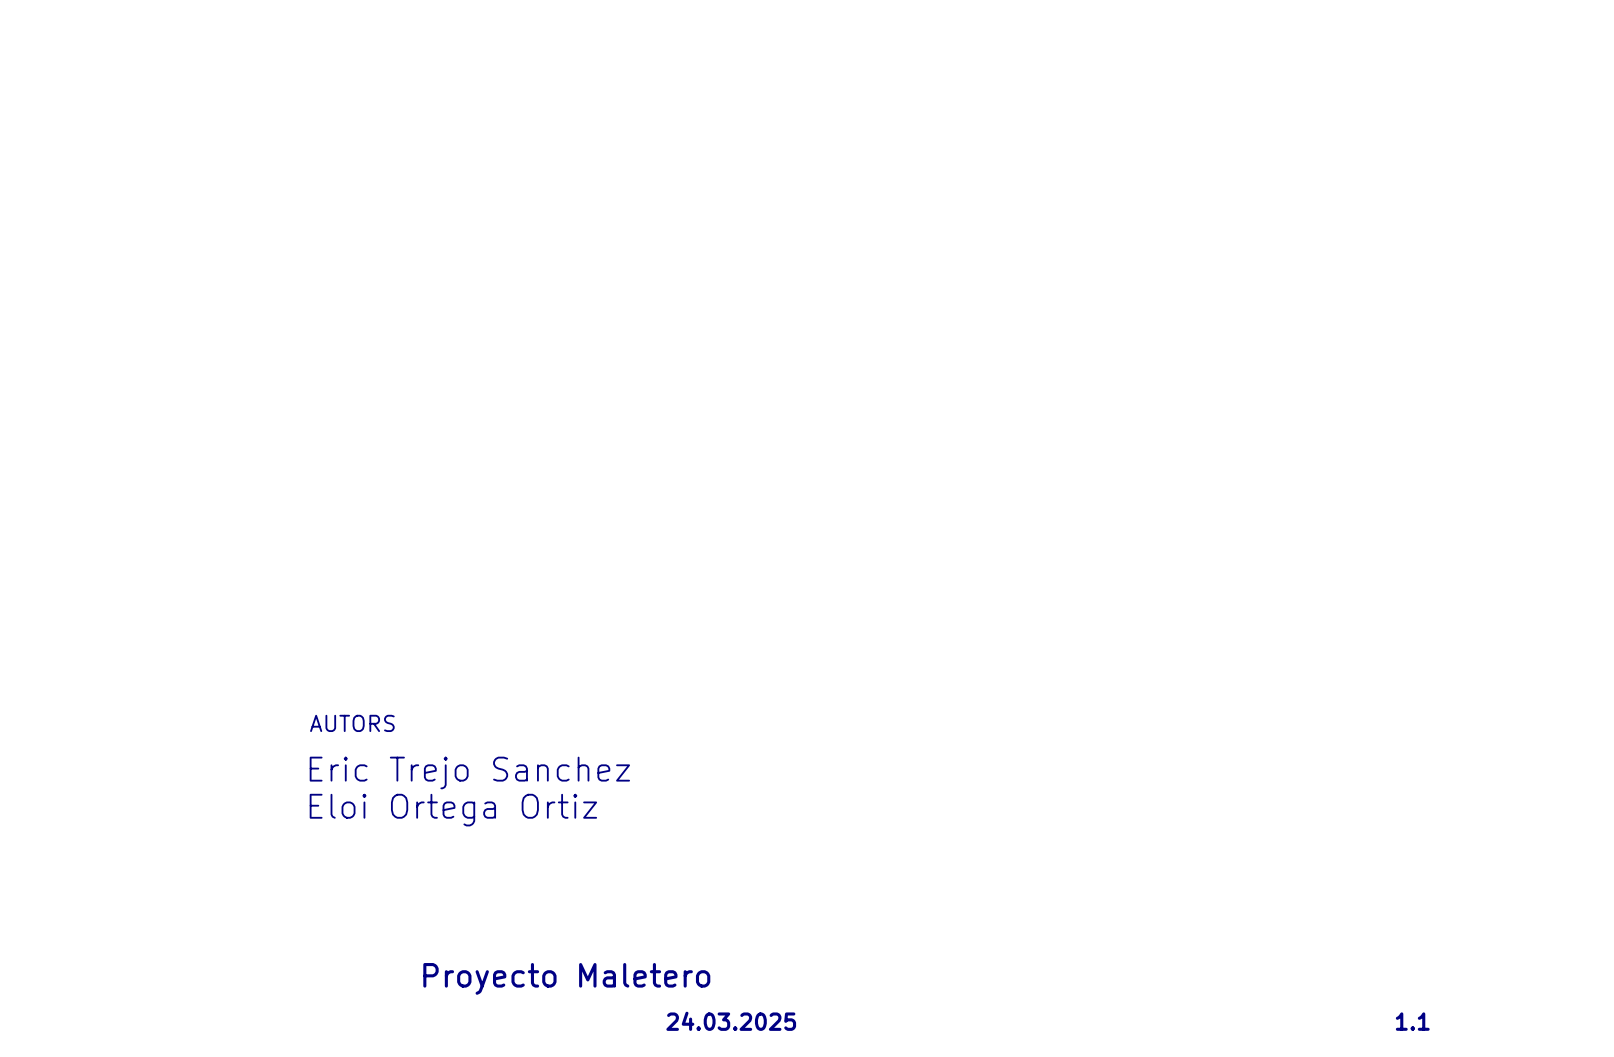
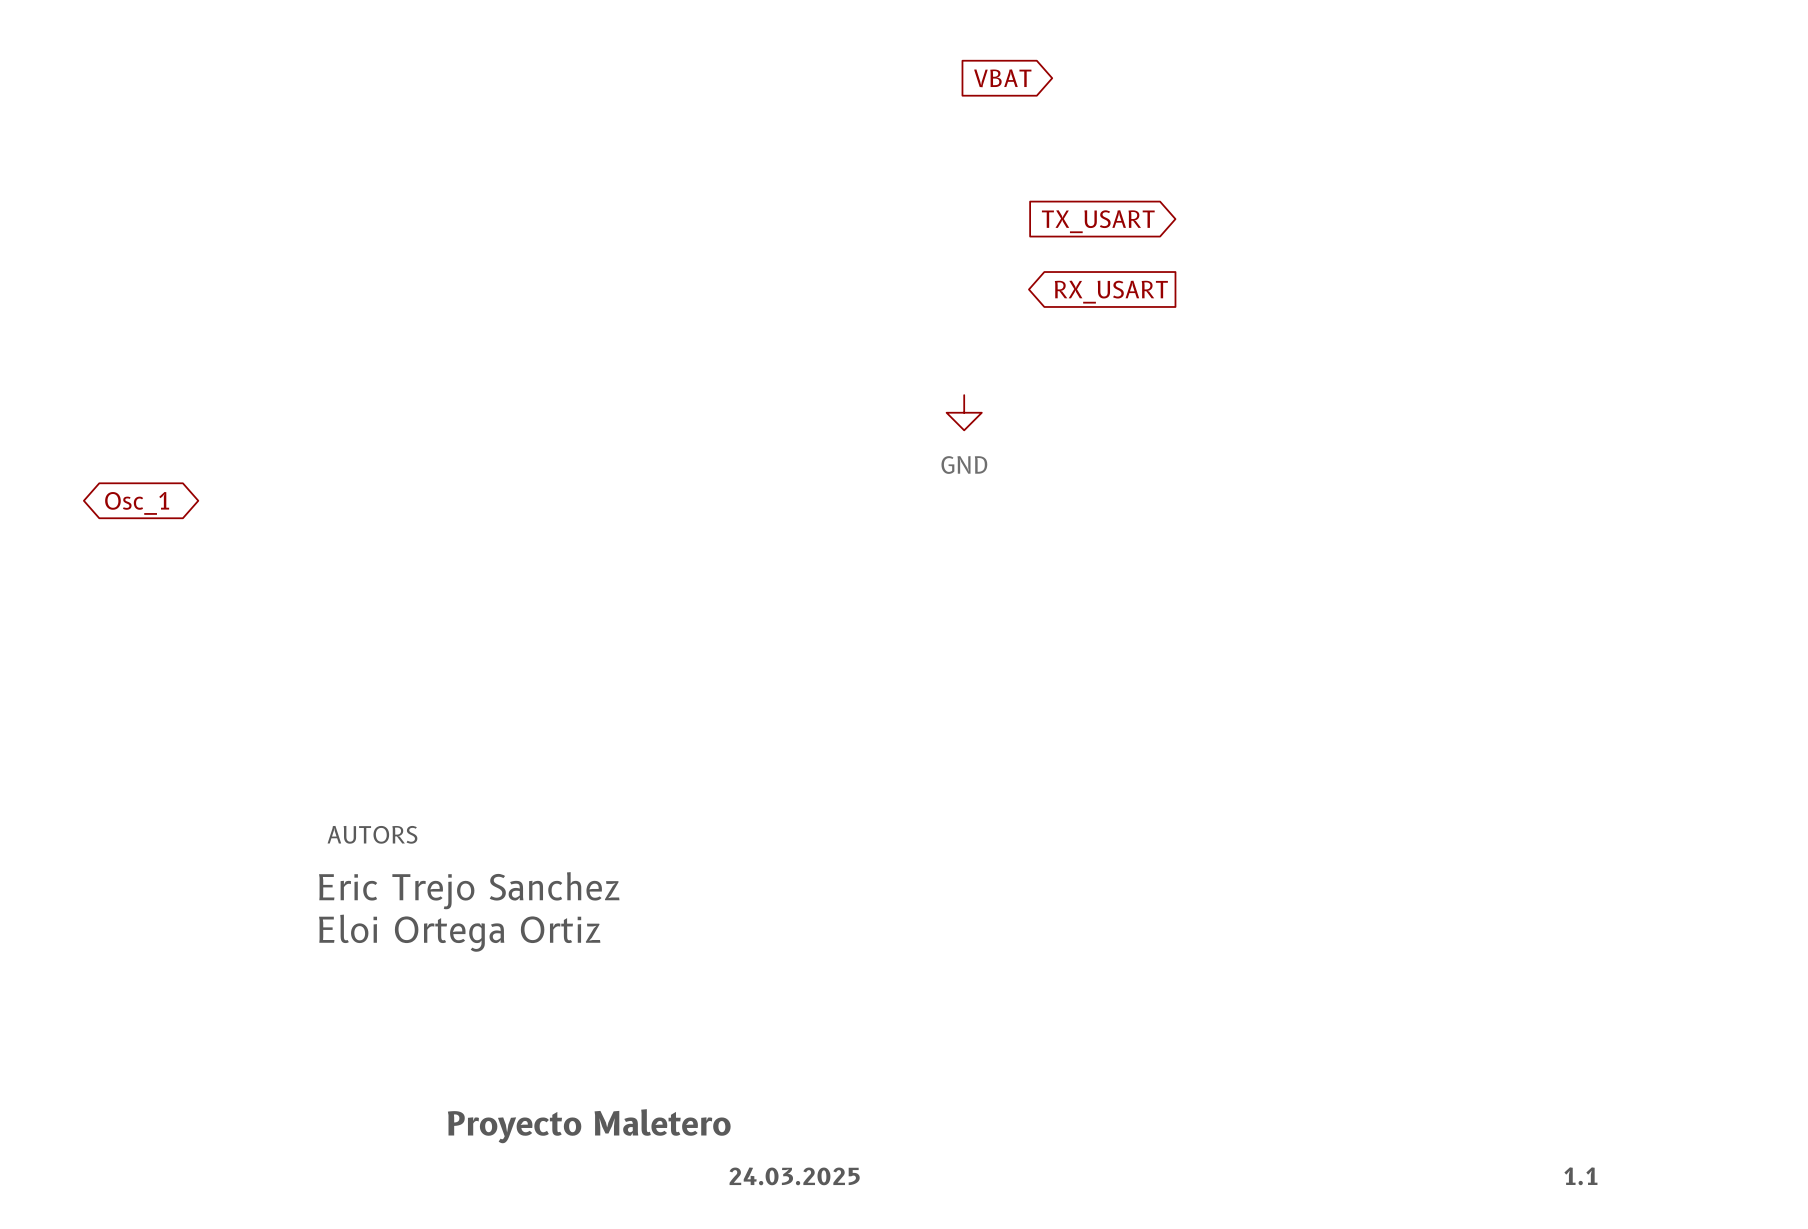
global label: none -> VBAT (1002, 78)
global label: none -> TX_USART (1098, 221)
global label: none -> RX_USART (1111, 292)
power symbol: none -> GND (964, 412)
global label: none -> Osc_1 (137, 503)

